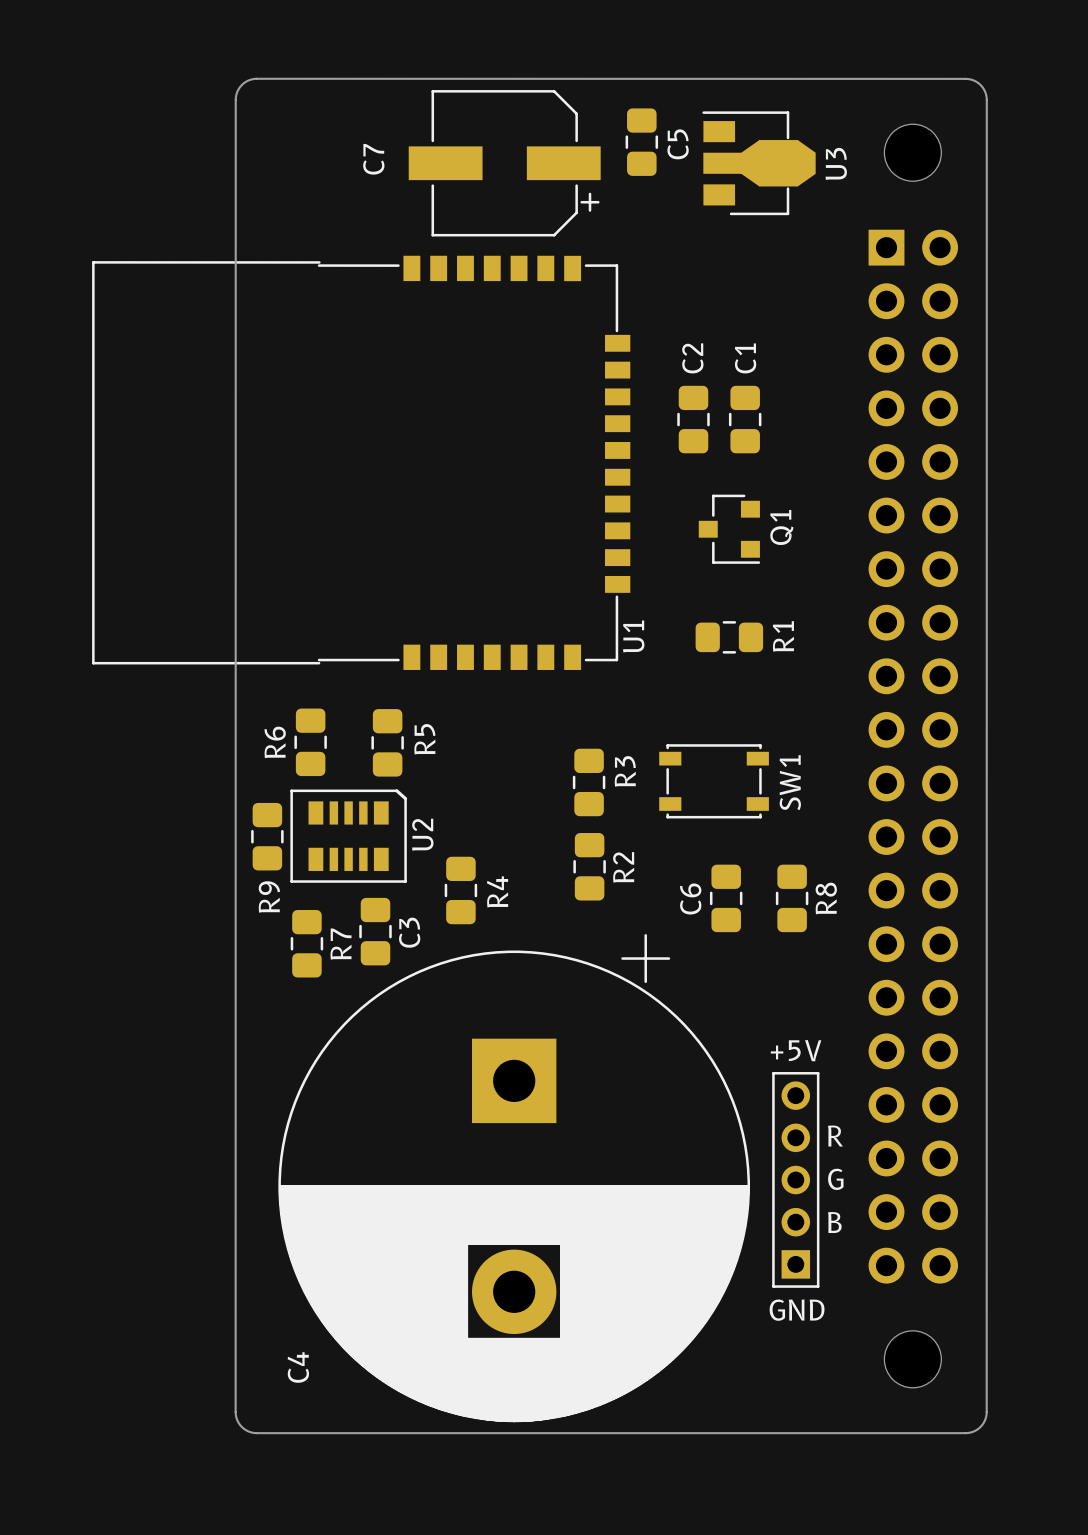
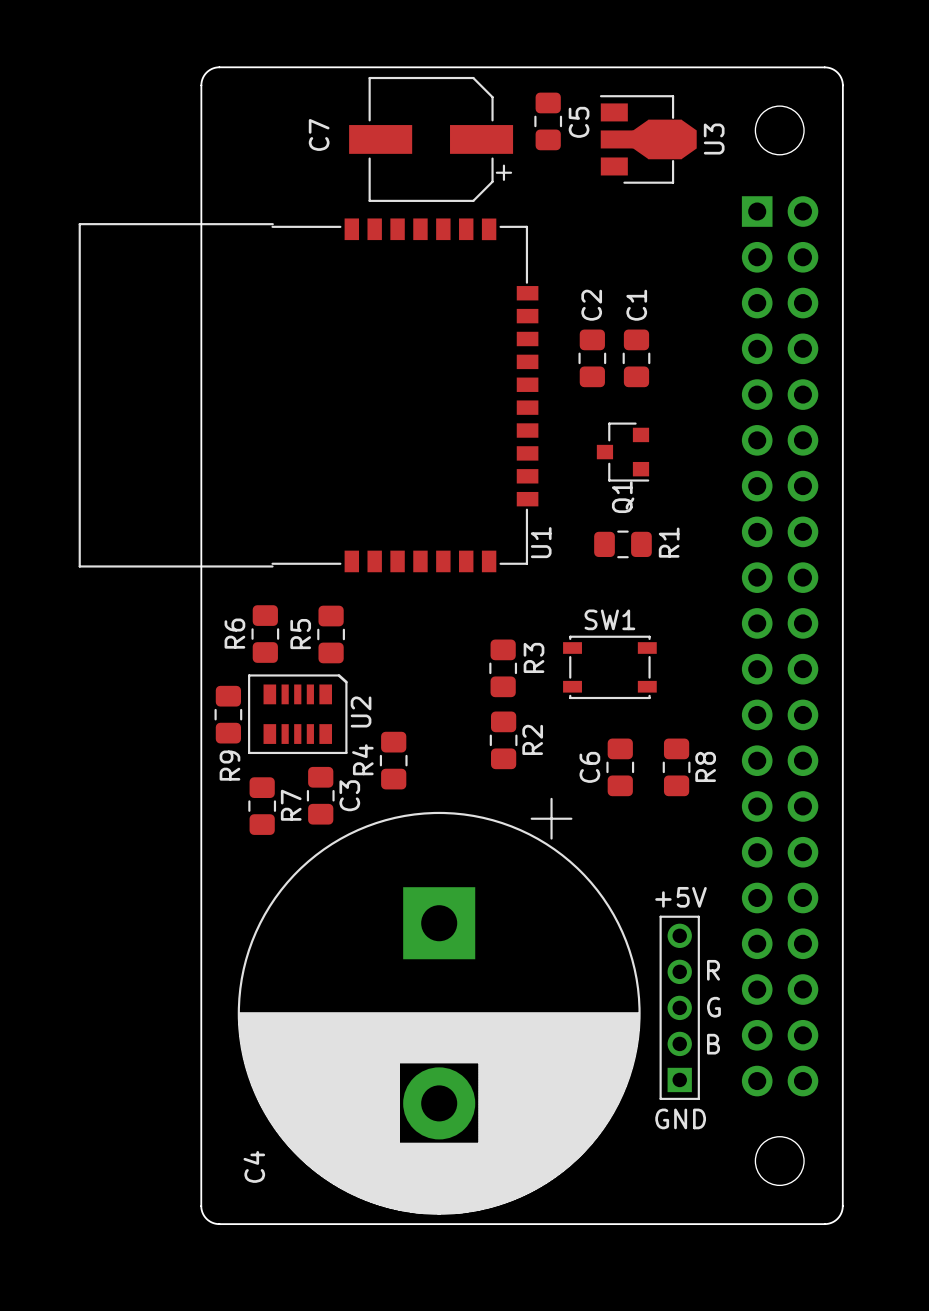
Q1 name position: Q1 (781, 527) -> Q1 (623, 497)
R5 name position: R5 (424, 739) -> R5 (300, 634)
SW1 name rotation: 0° (790, 782) -> 90° clockwise (609, 619)
SW1 name position: SW1 (790, 782) -> SW1 (609, 619)
R4 name position: R4 (497, 891) -> R4 (362, 759)

